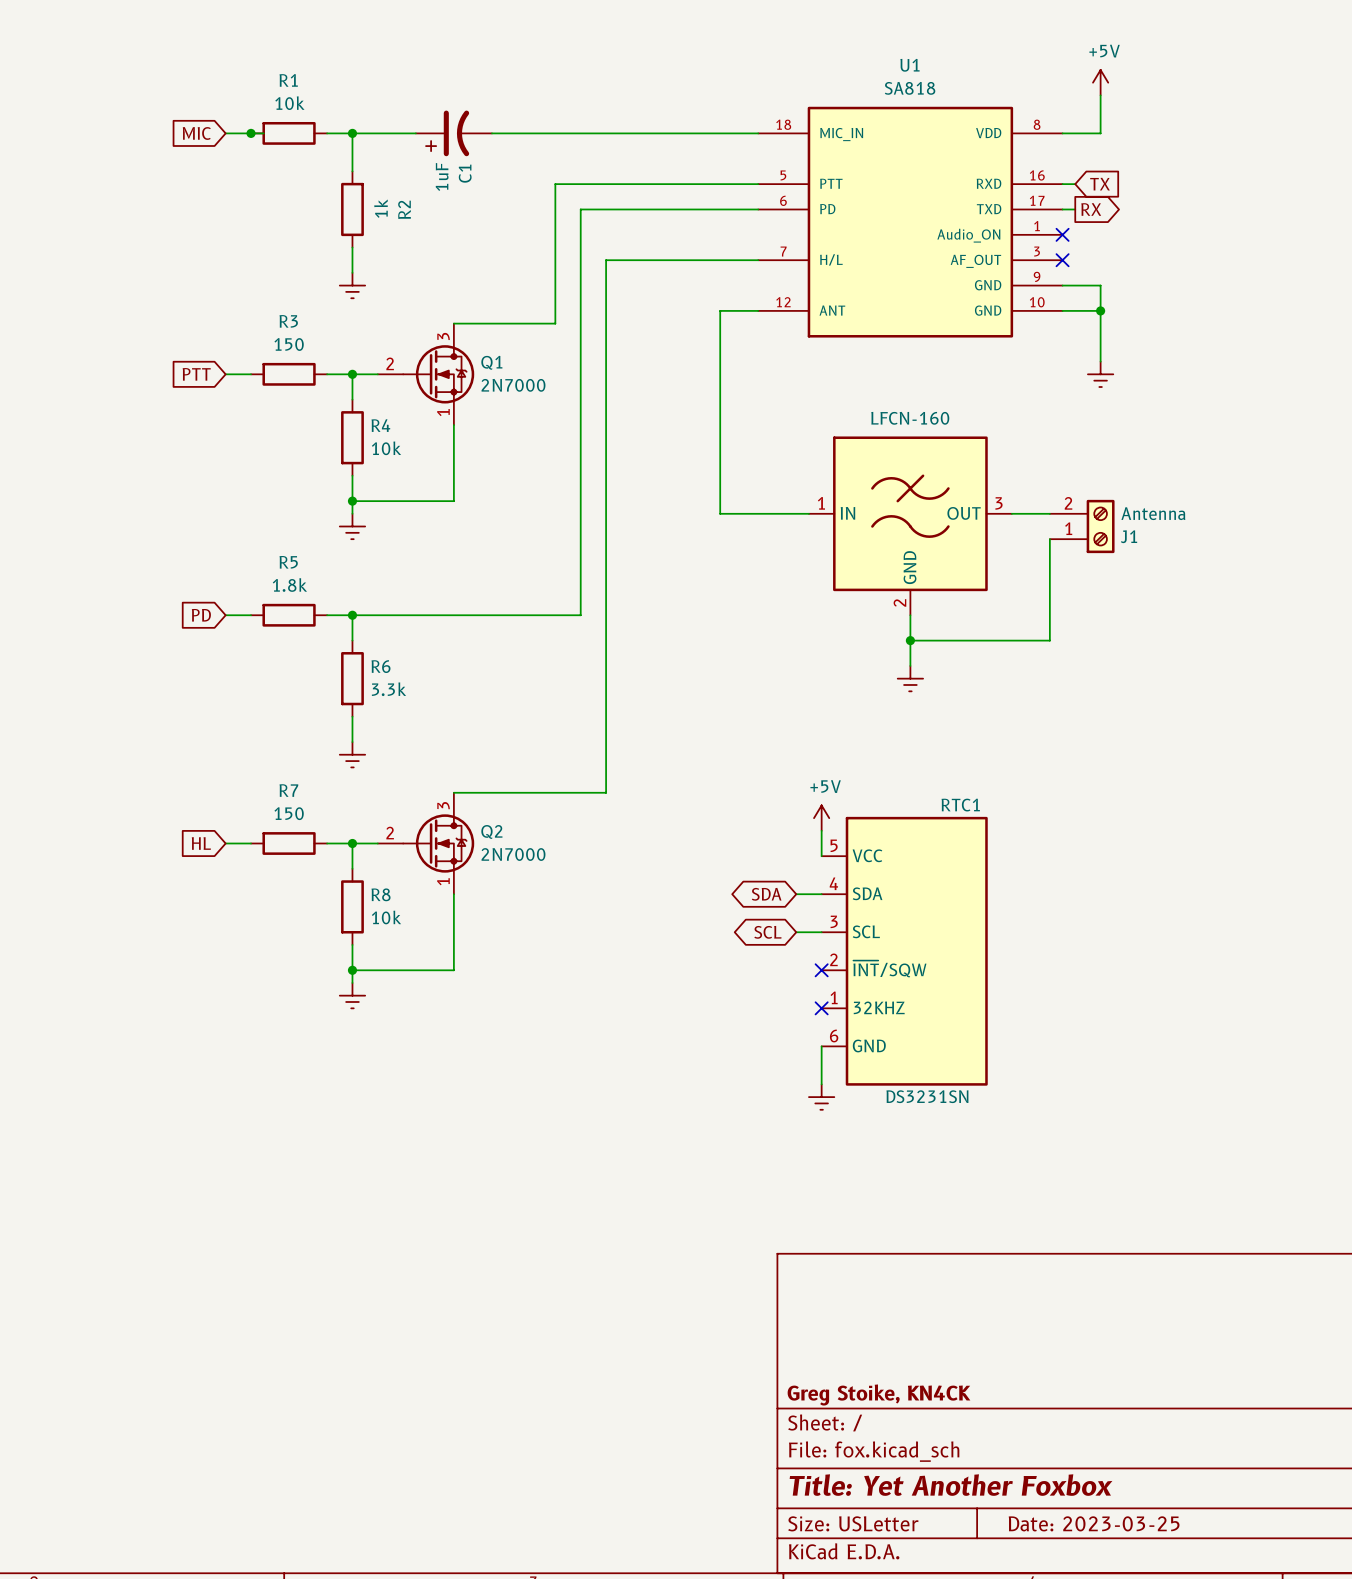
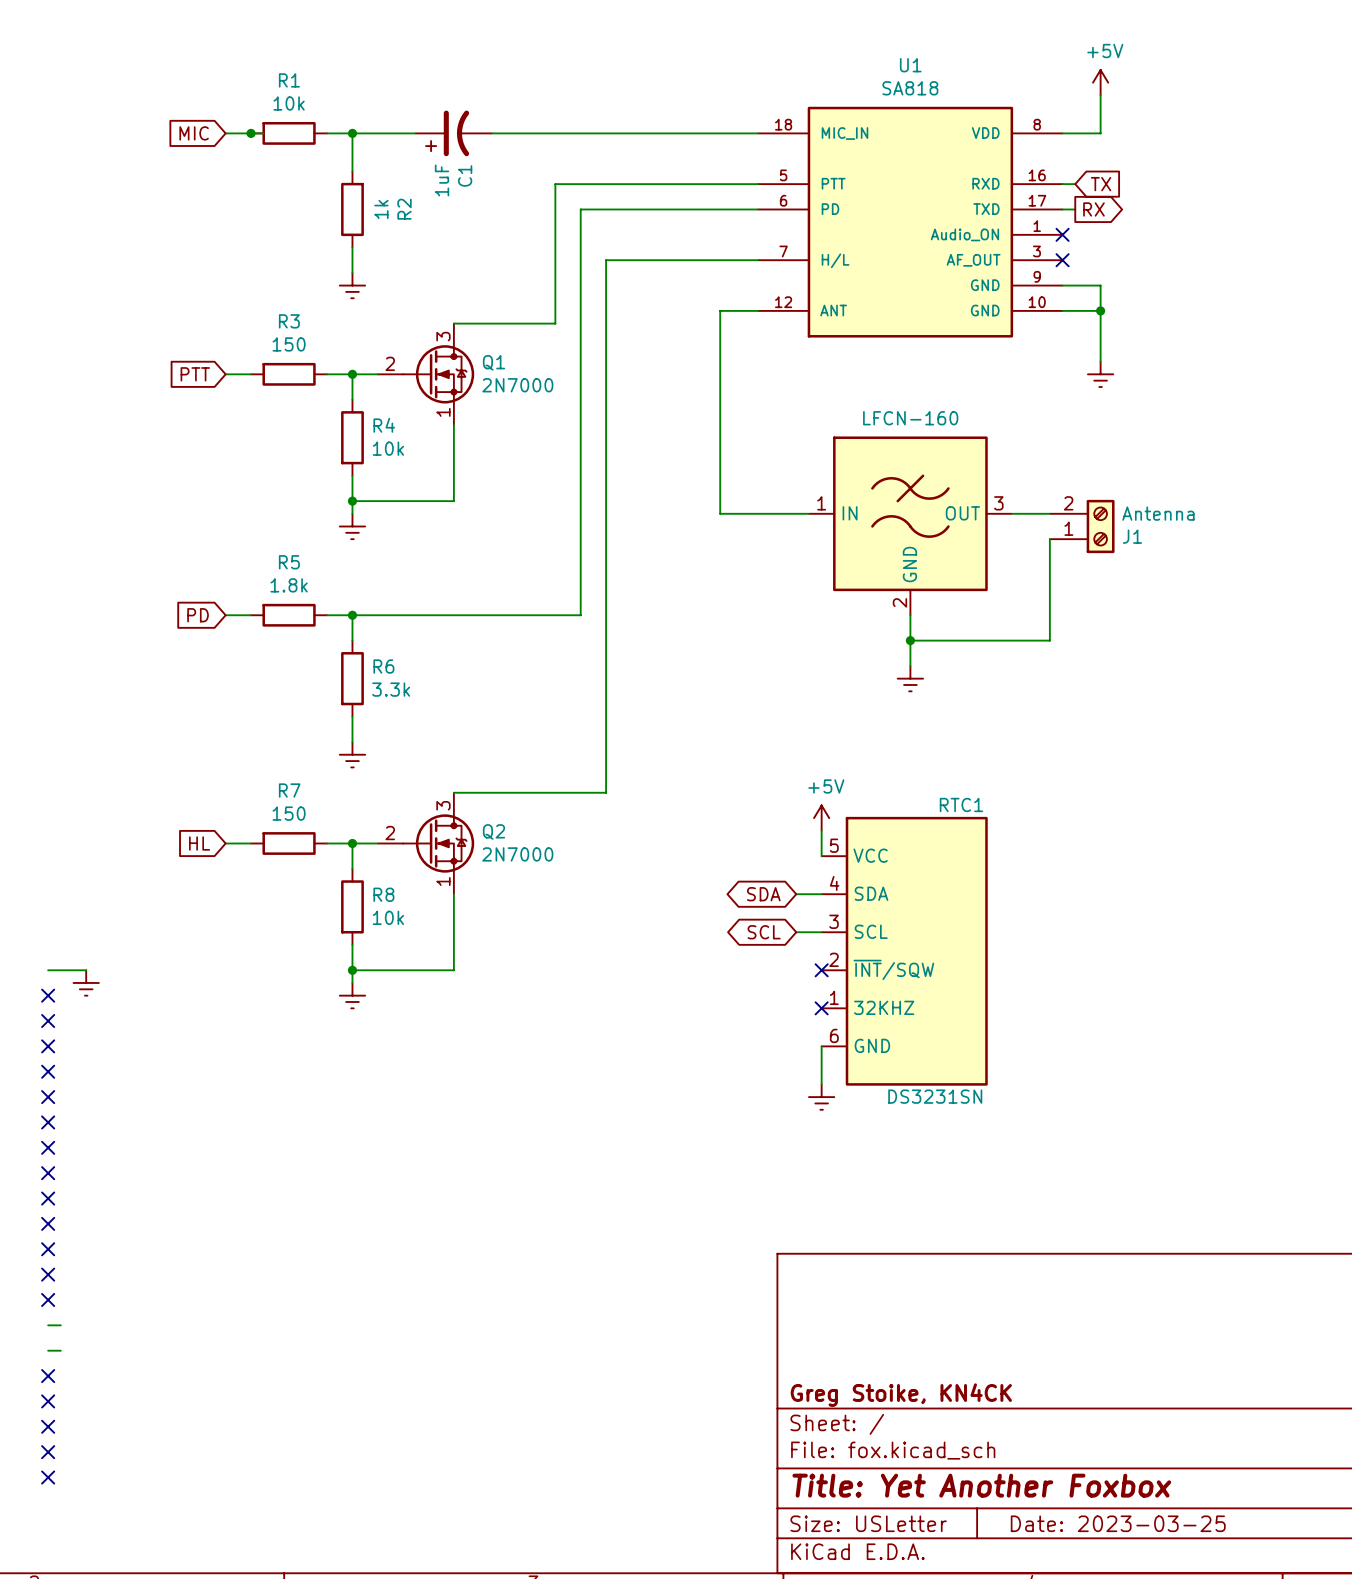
wire: none -> (48, 970) (86, 970)
power symbol: none -> (86, 982)
no-connect mark: none -> (48, 995)
no-connect mark: none -> (48, 1021)
no-connect mark: none -> (48, 1046)
no-connect mark: none -> (48, 1071)
no-connect mark: none -> (48, 1097)
no-connect mark: none -> (48, 1122)
no-connect mark: none -> (48, 1147)
no-connect mark: none -> (48, 1173)
no-connect mark: none -> (48, 1198)
no-connect mark: none -> (48, 1223)
no-connect mark: none -> (48, 1249)
no-connect mark: none -> (48, 1274)
no-connect mark: none -> (48, 1299)
wire: none -> (48, 1325) (60, 1325)
wire: none -> (48, 1350) (60, 1350)
no-connect mark: none -> (48, 1376)
no-connect mark: none -> (48, 1401)
no-connect mark: none -> (48, 1426)
no-connect mark: none -> (48, 1452)
no-connect mark: none -> (48, 1477)

